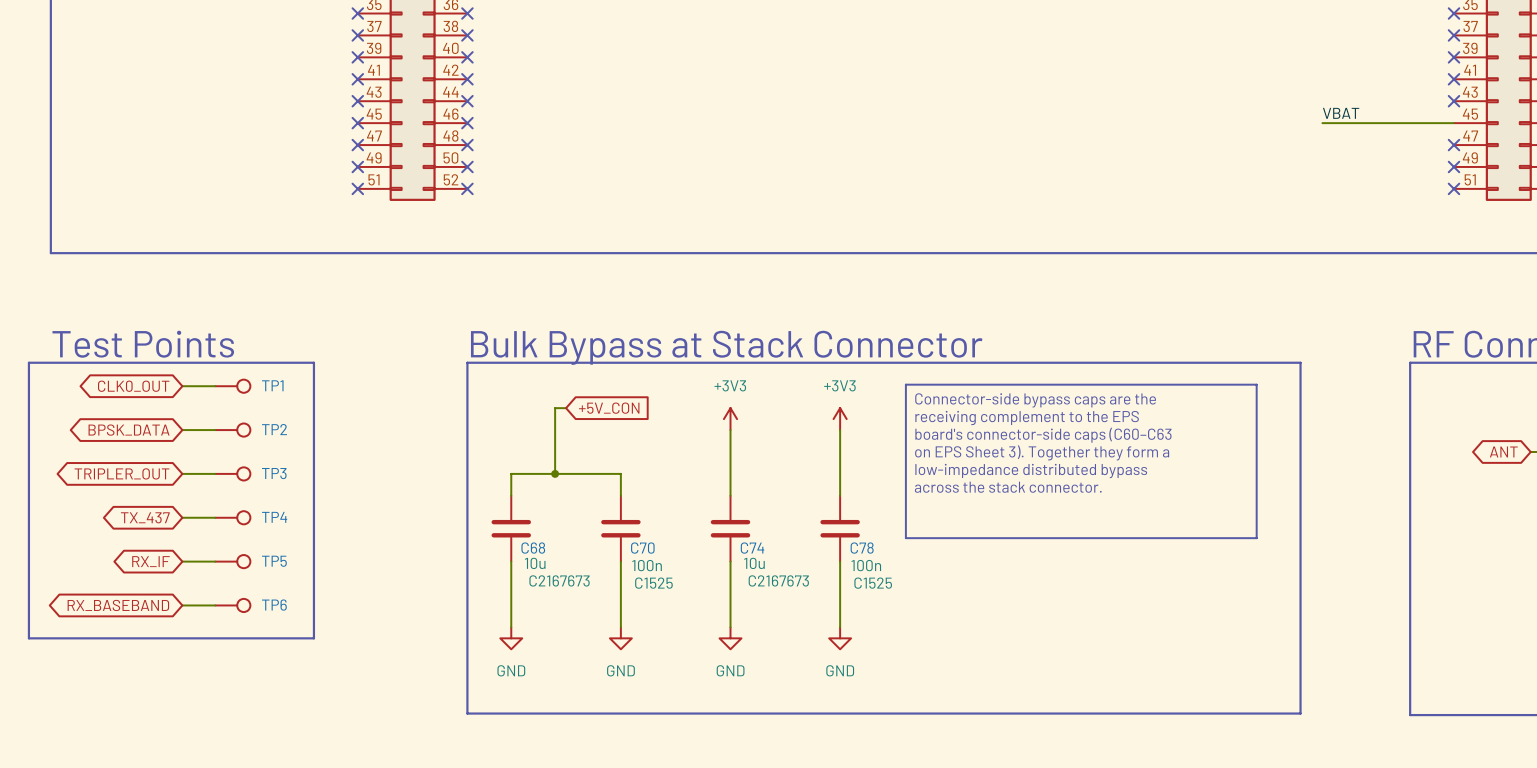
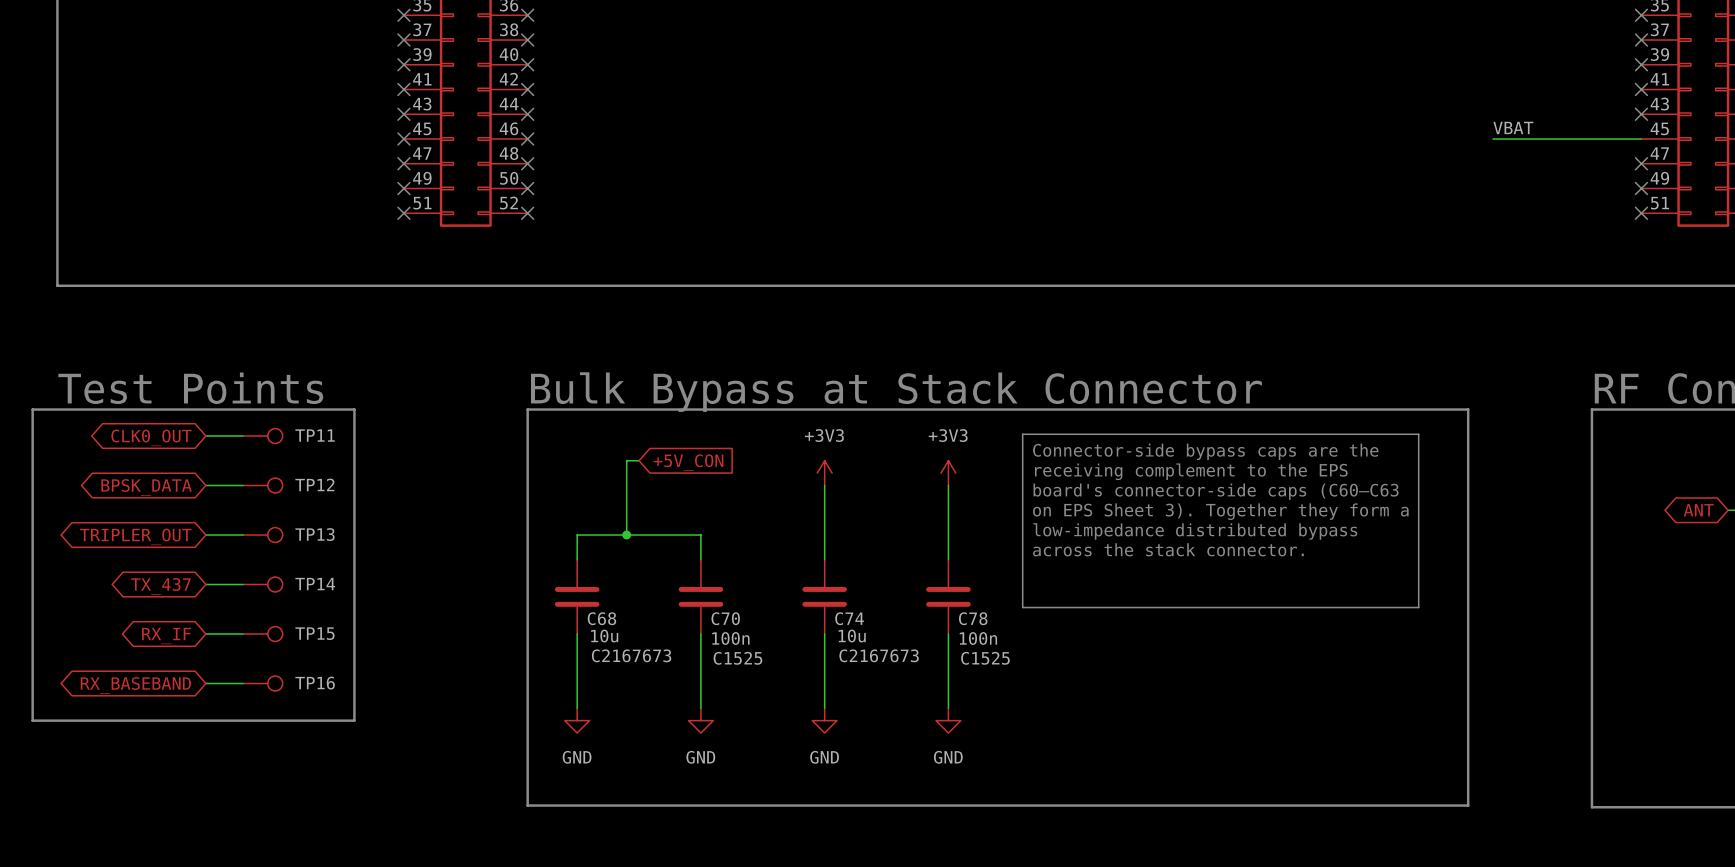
TP1 name: TP1 (272, 385) -> TP11 (315, 435)
TP2 name: TP2 (274, 429) -> TP12 (314, 484)
TP3 name: TP3 (274, 473) -> TP13 (315, 534)
TP4 name: TP4 (274, 517) -> TP14 (315, 584)
TP5 name: TP5 (274, 561) -> TP15 (314, 633)
TP6 name: TP6 (274, 605) -> TP16 (315, 683)

